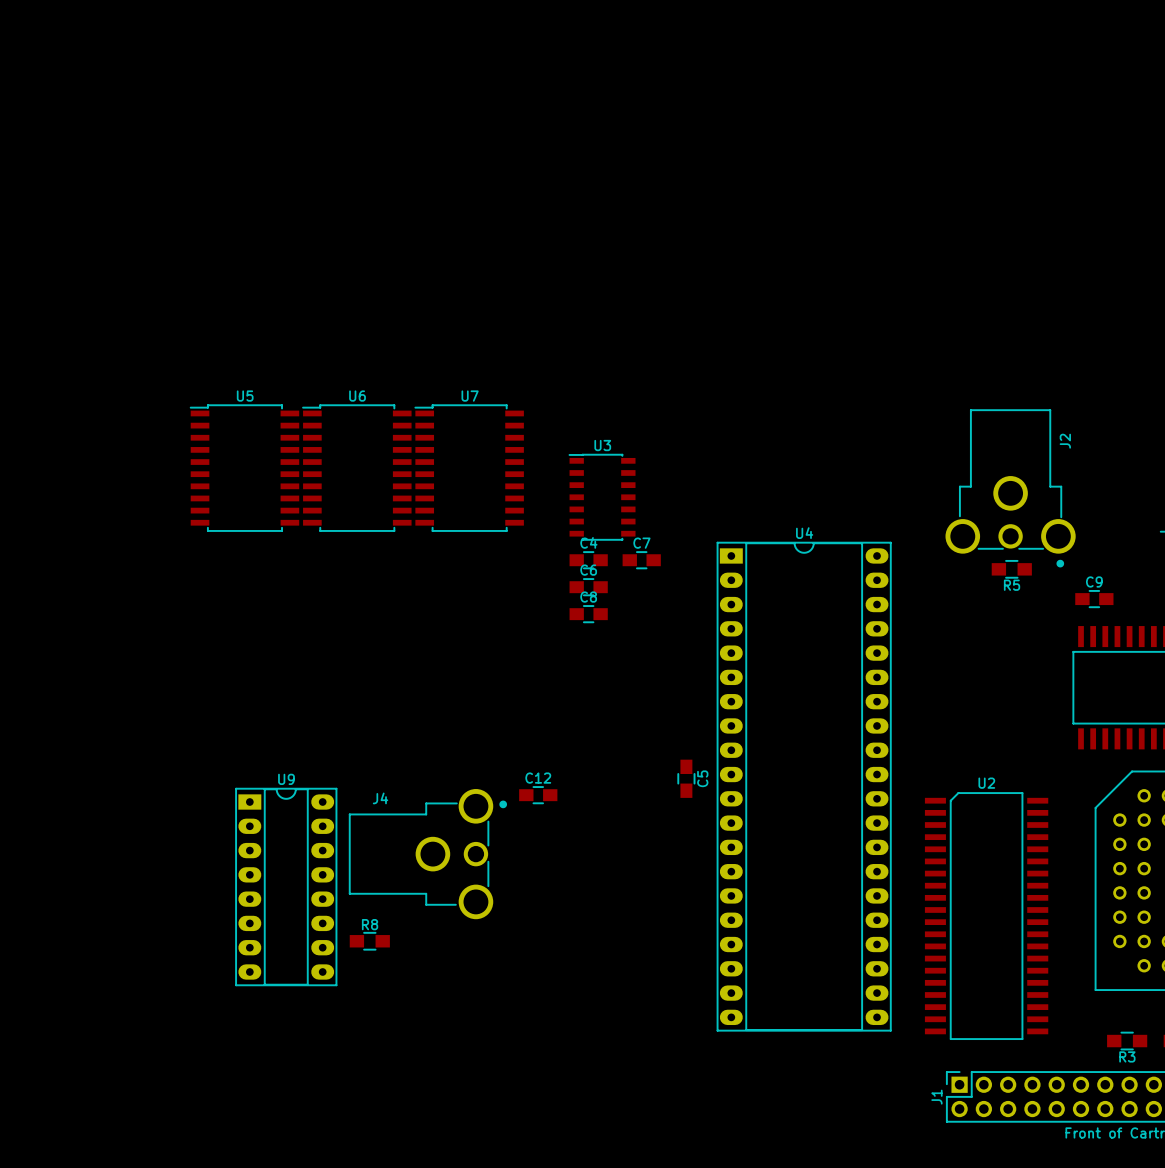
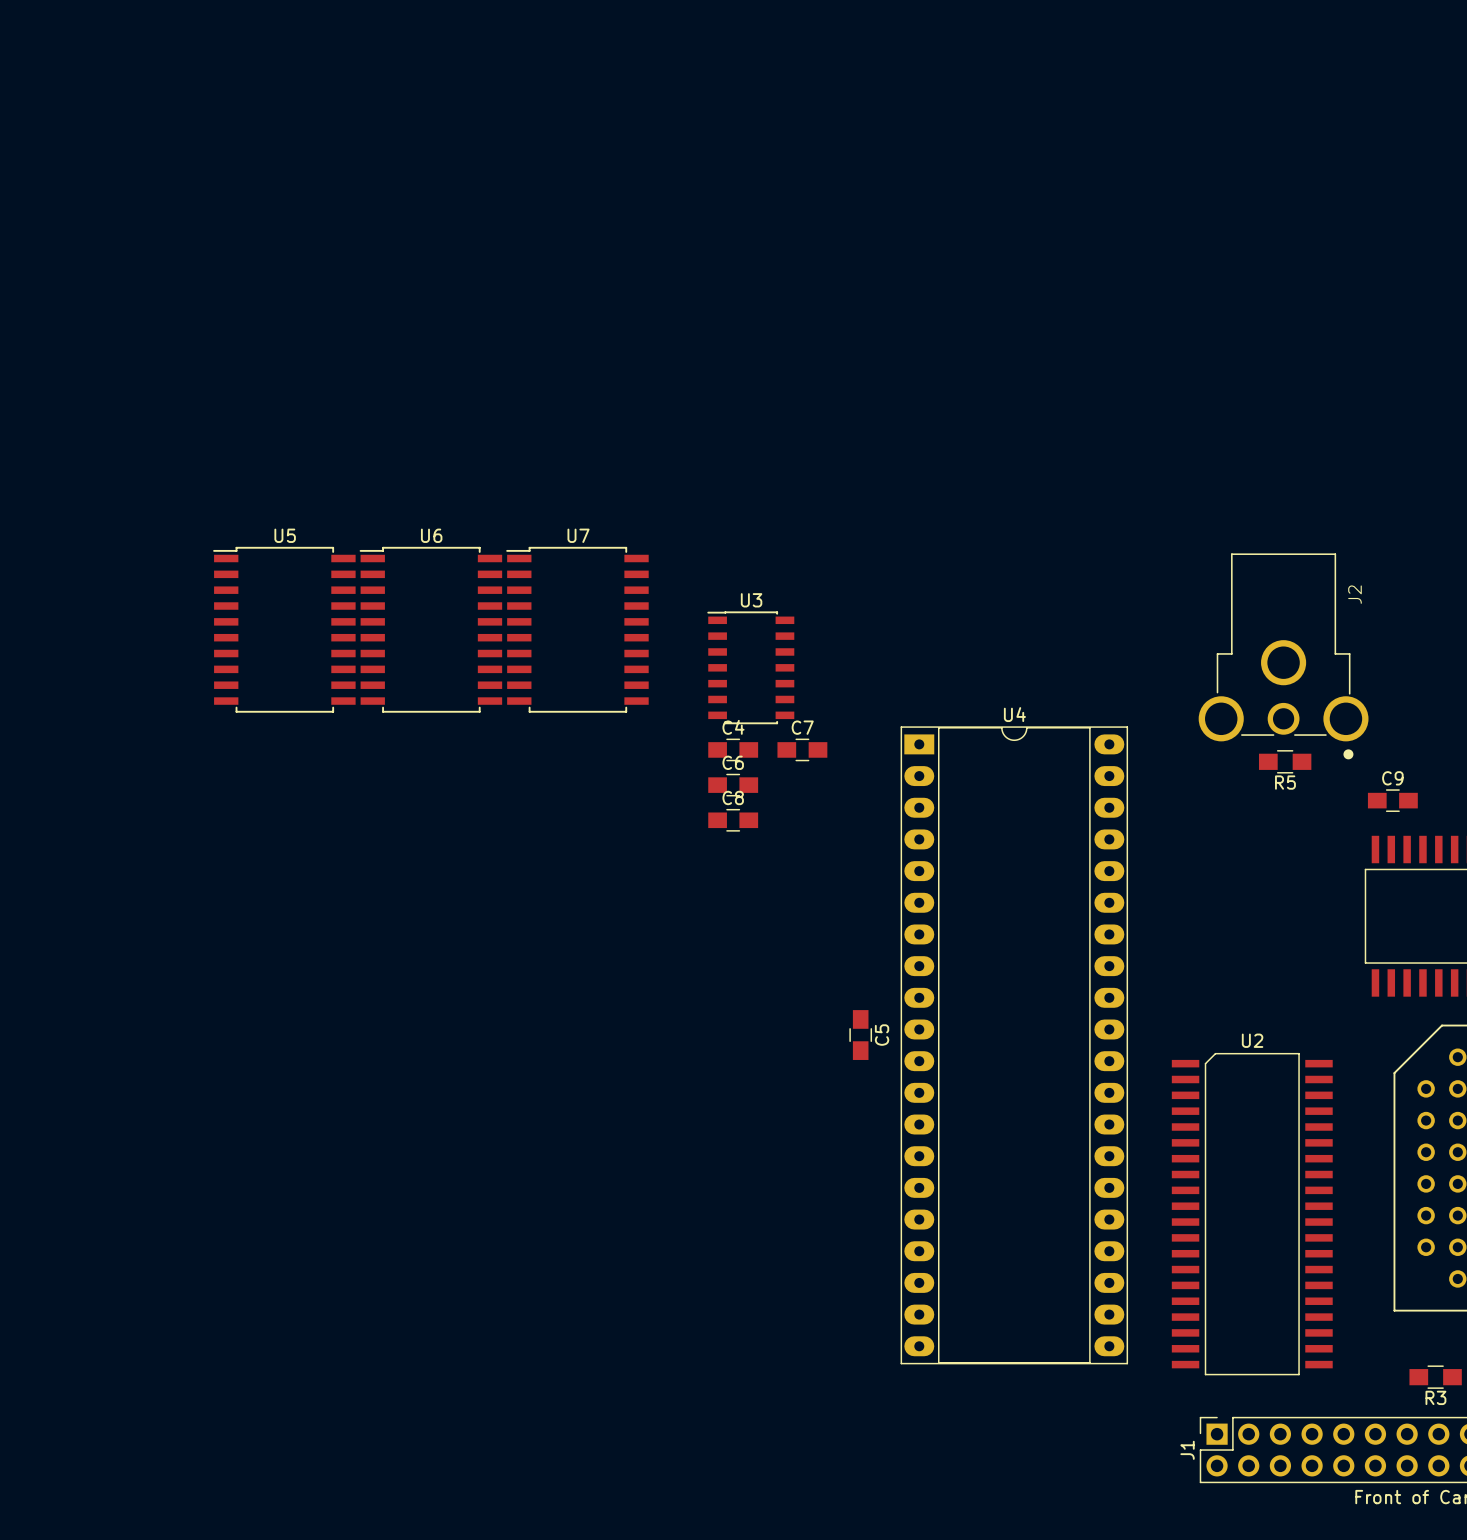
C12: (538, 795) -> none
J4: (428, 854) -> none
U9: (286, 886) -> none
R8: (369, 941) -> none

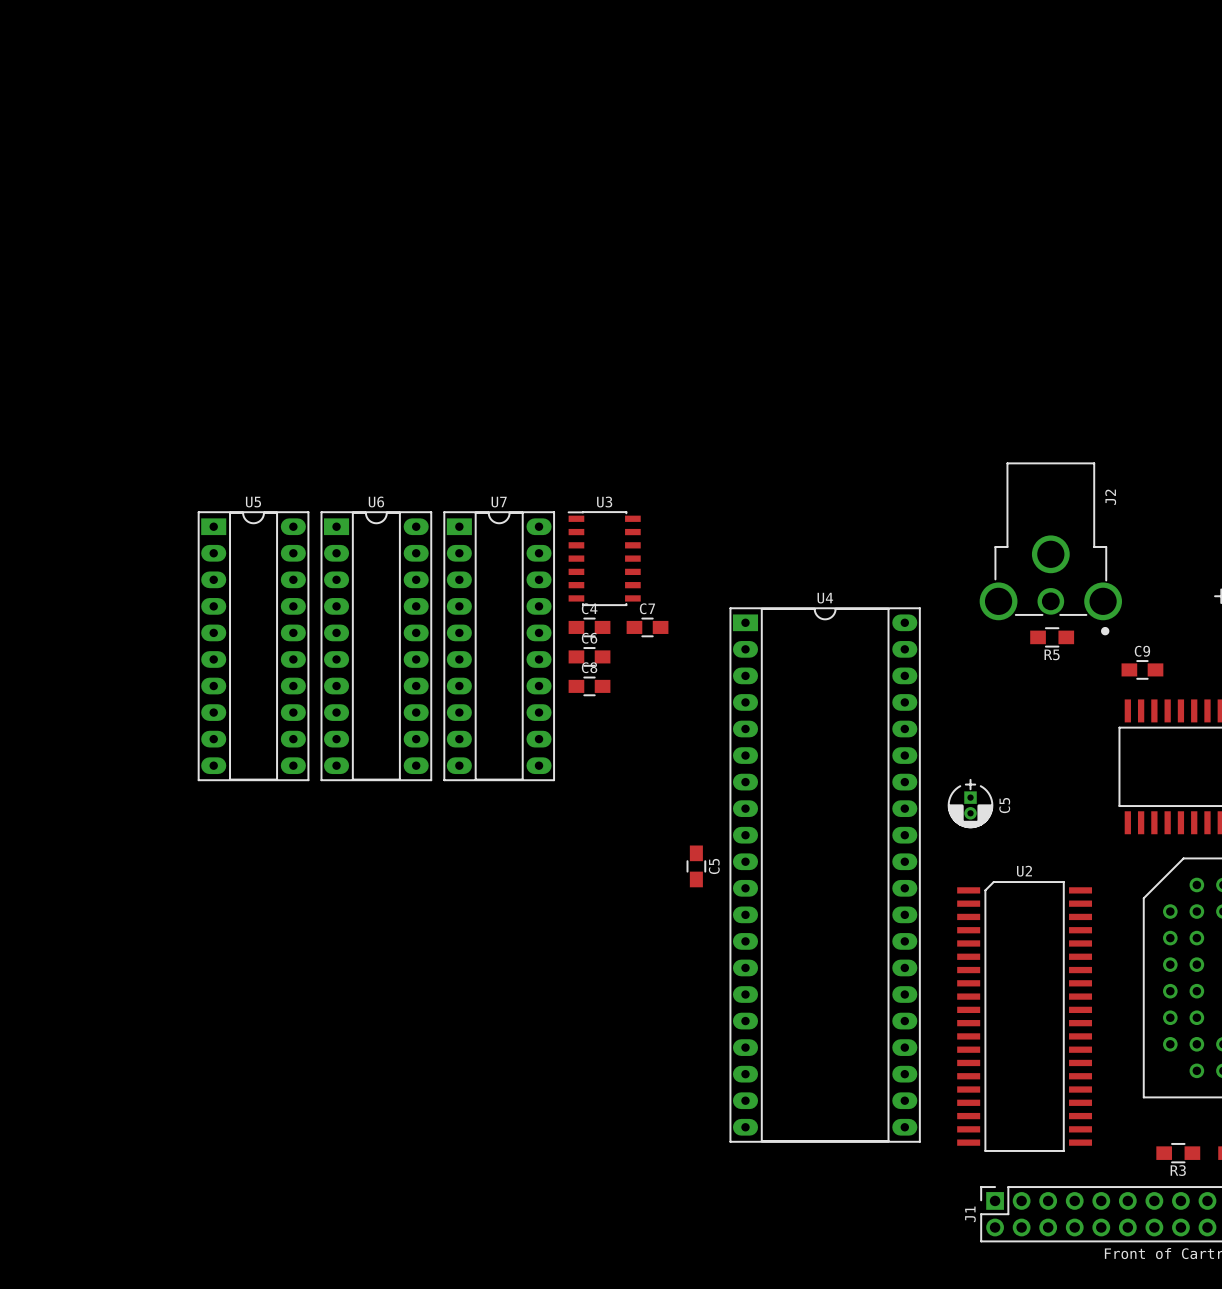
U5 name position: U5 (285, 535) -> U5 (253, 502)
U6 name position: U6 (431, 535) -> U6 (376, 501)
U7 name position: U7 (578, 535) -> U7 (499, 502)
U5 footprint: [213, 546, 356, 713] -> [198, 511, 310, 781]
U6 footprint: [359, 546, 503, 713] -> [320, 511, 432, 781]
U7 footprint: [506, 546, 649, 713] -> [443, 511, 555, 781]
C5: none -> (970, 803)

